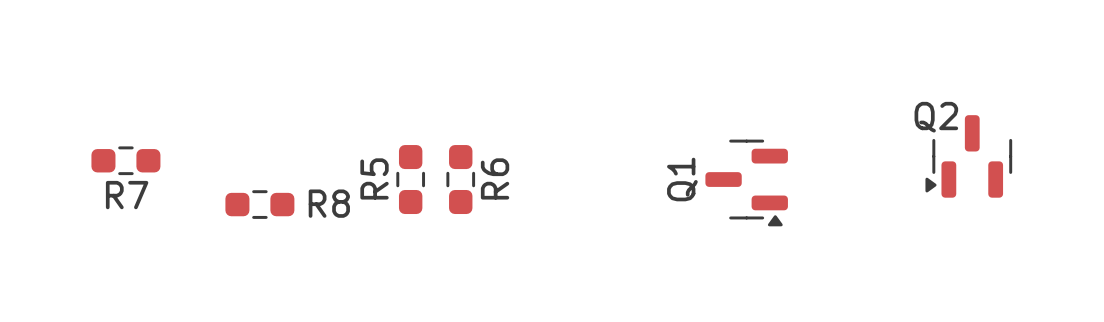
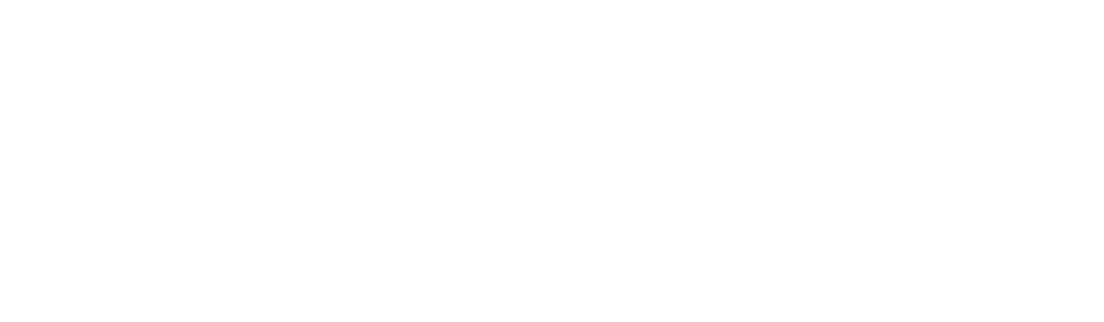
Q2: (968, 156) -> none
R7: (125, 160) -> none
R5: (410, 179) -> none
R6: (460, 179) -> none
Q1: (746, 182) -> none
R8: (259, 204) -> none

